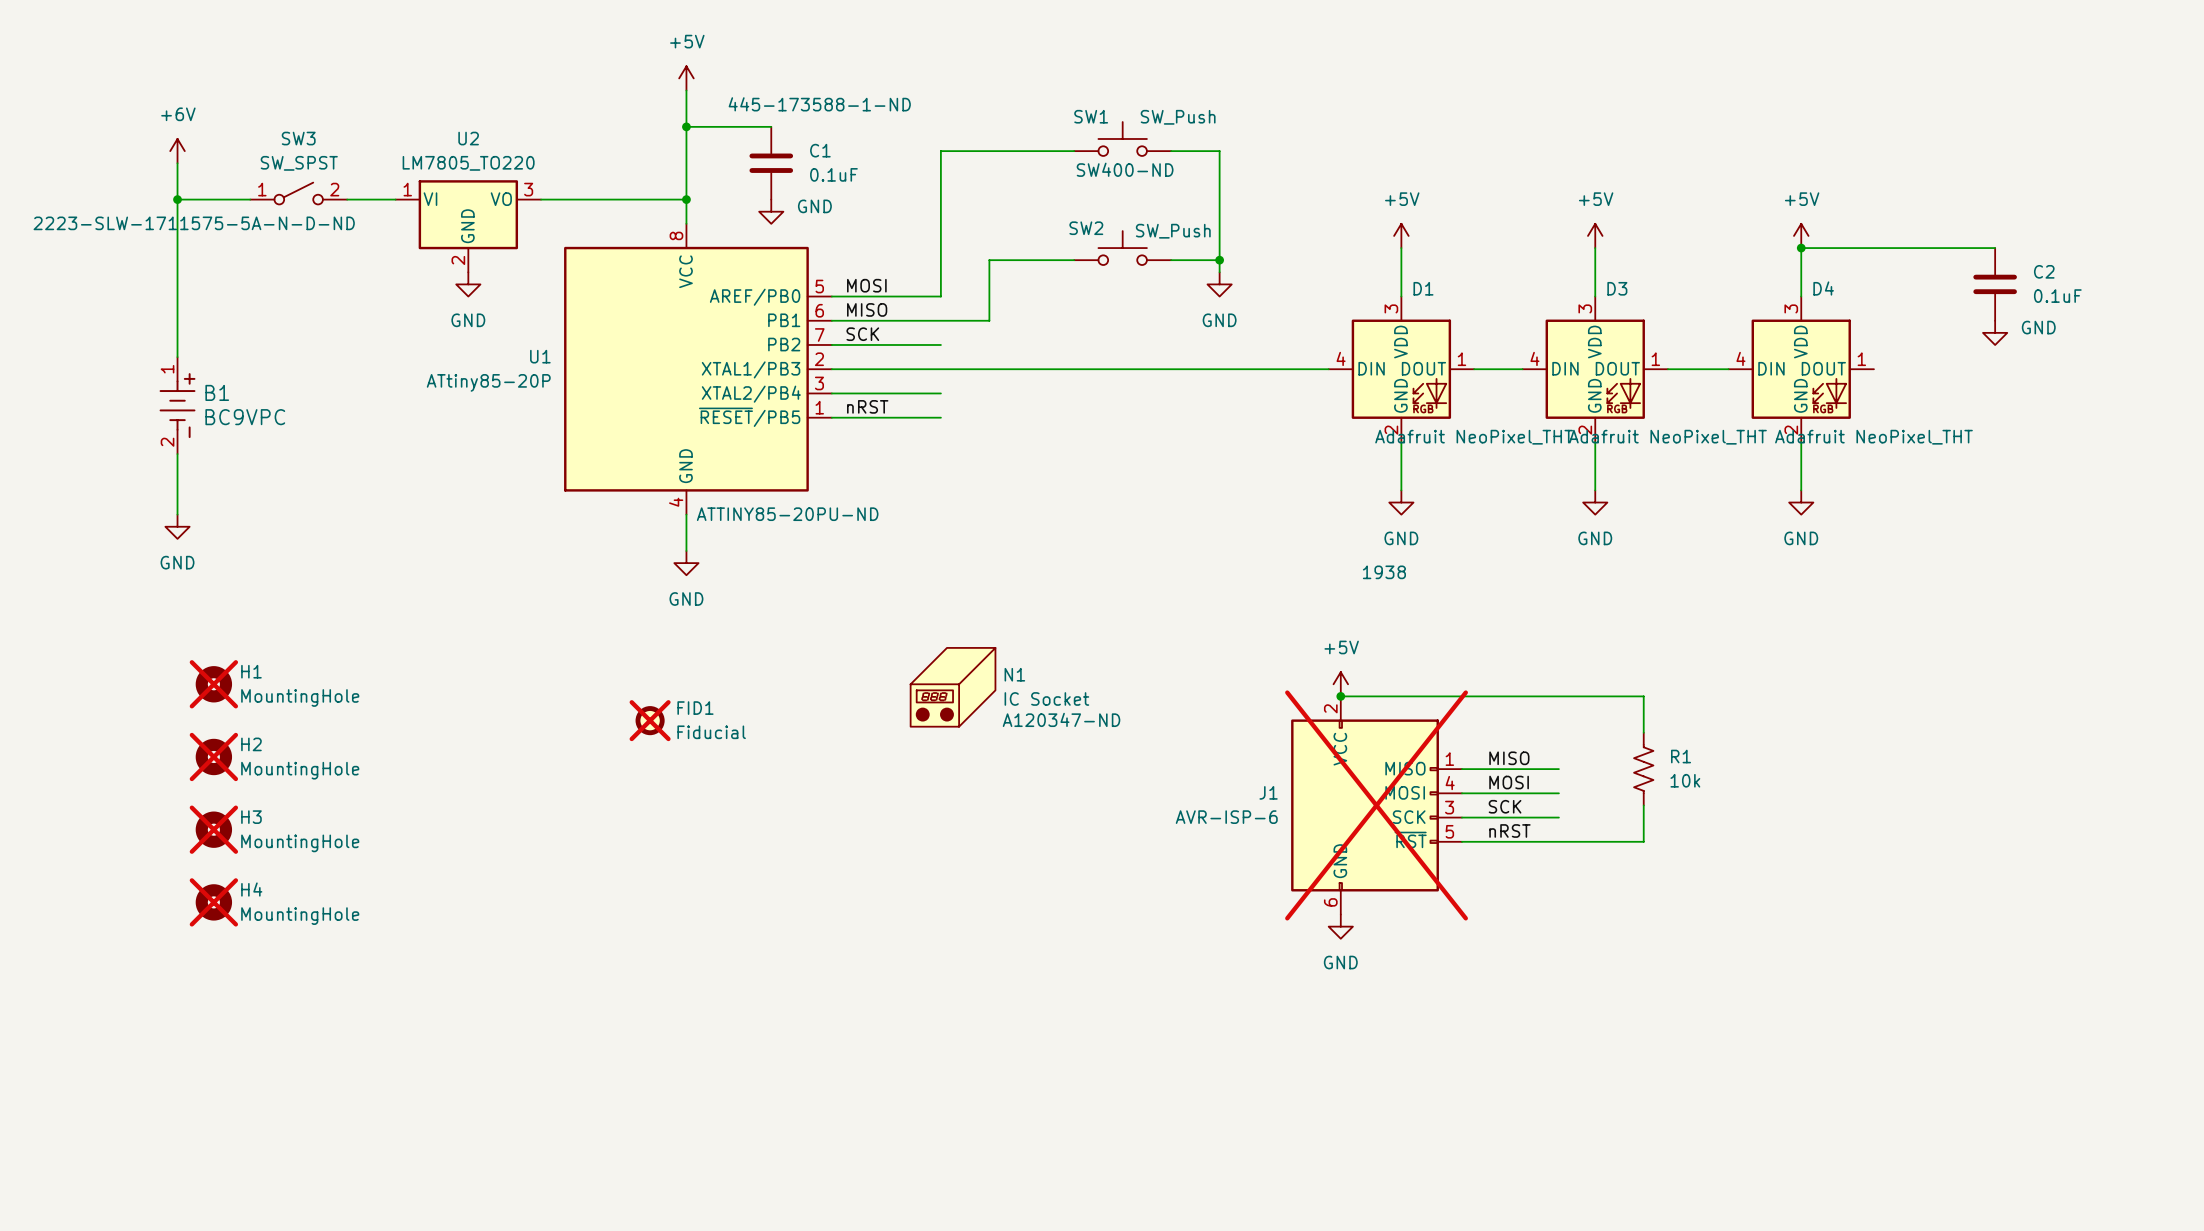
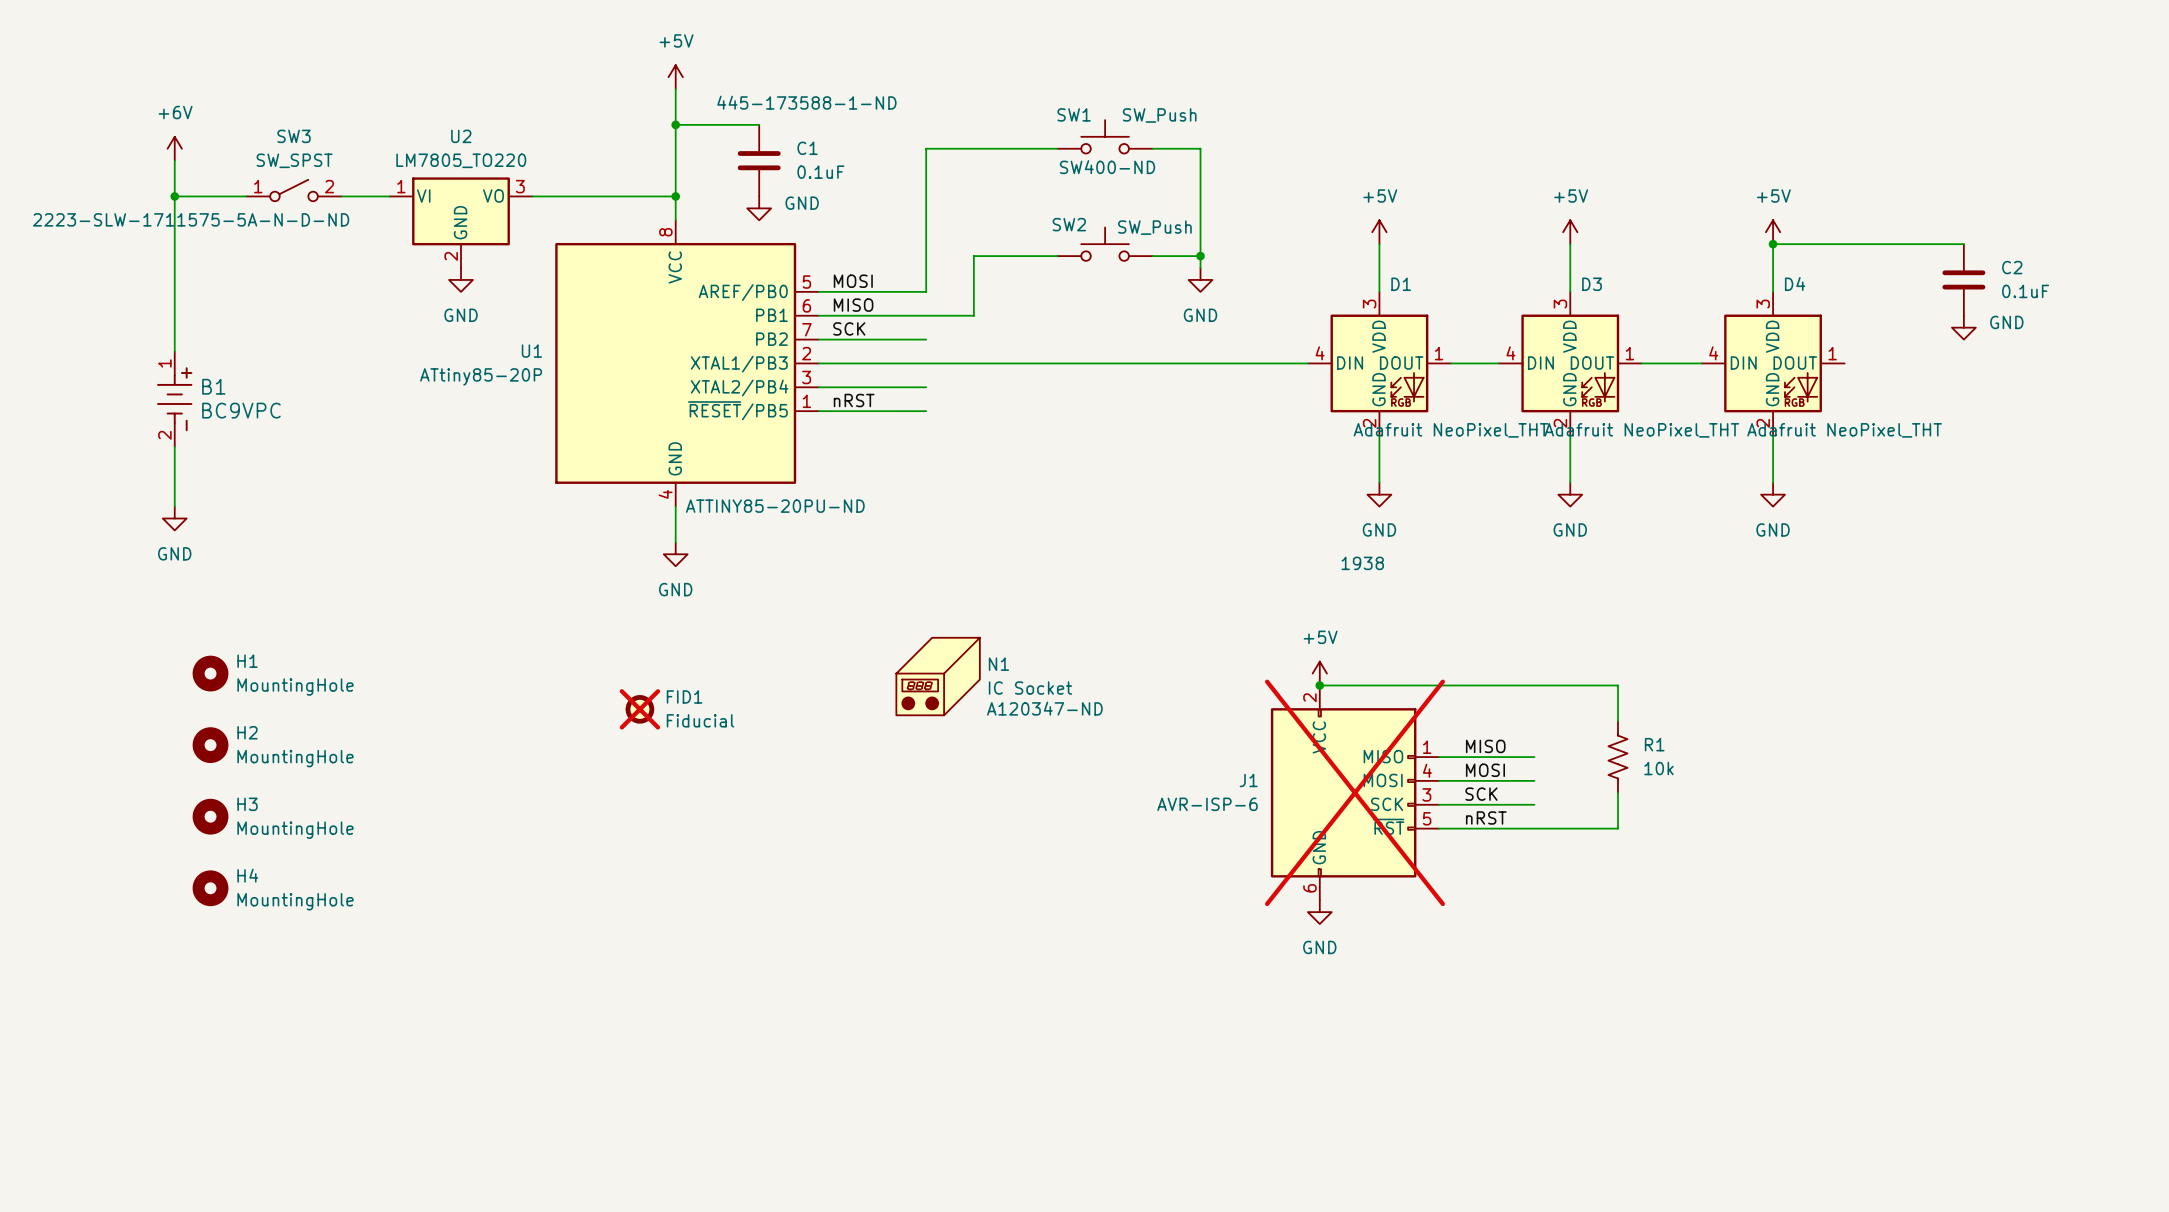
H1 do-not-place cross: (213, 684) -> none
H2 do-not-place cross: (213, 756) -> none
H3 do-not-place cross: (213, 829) -> none
H4 do-not-place cross: (213, 902) -> none

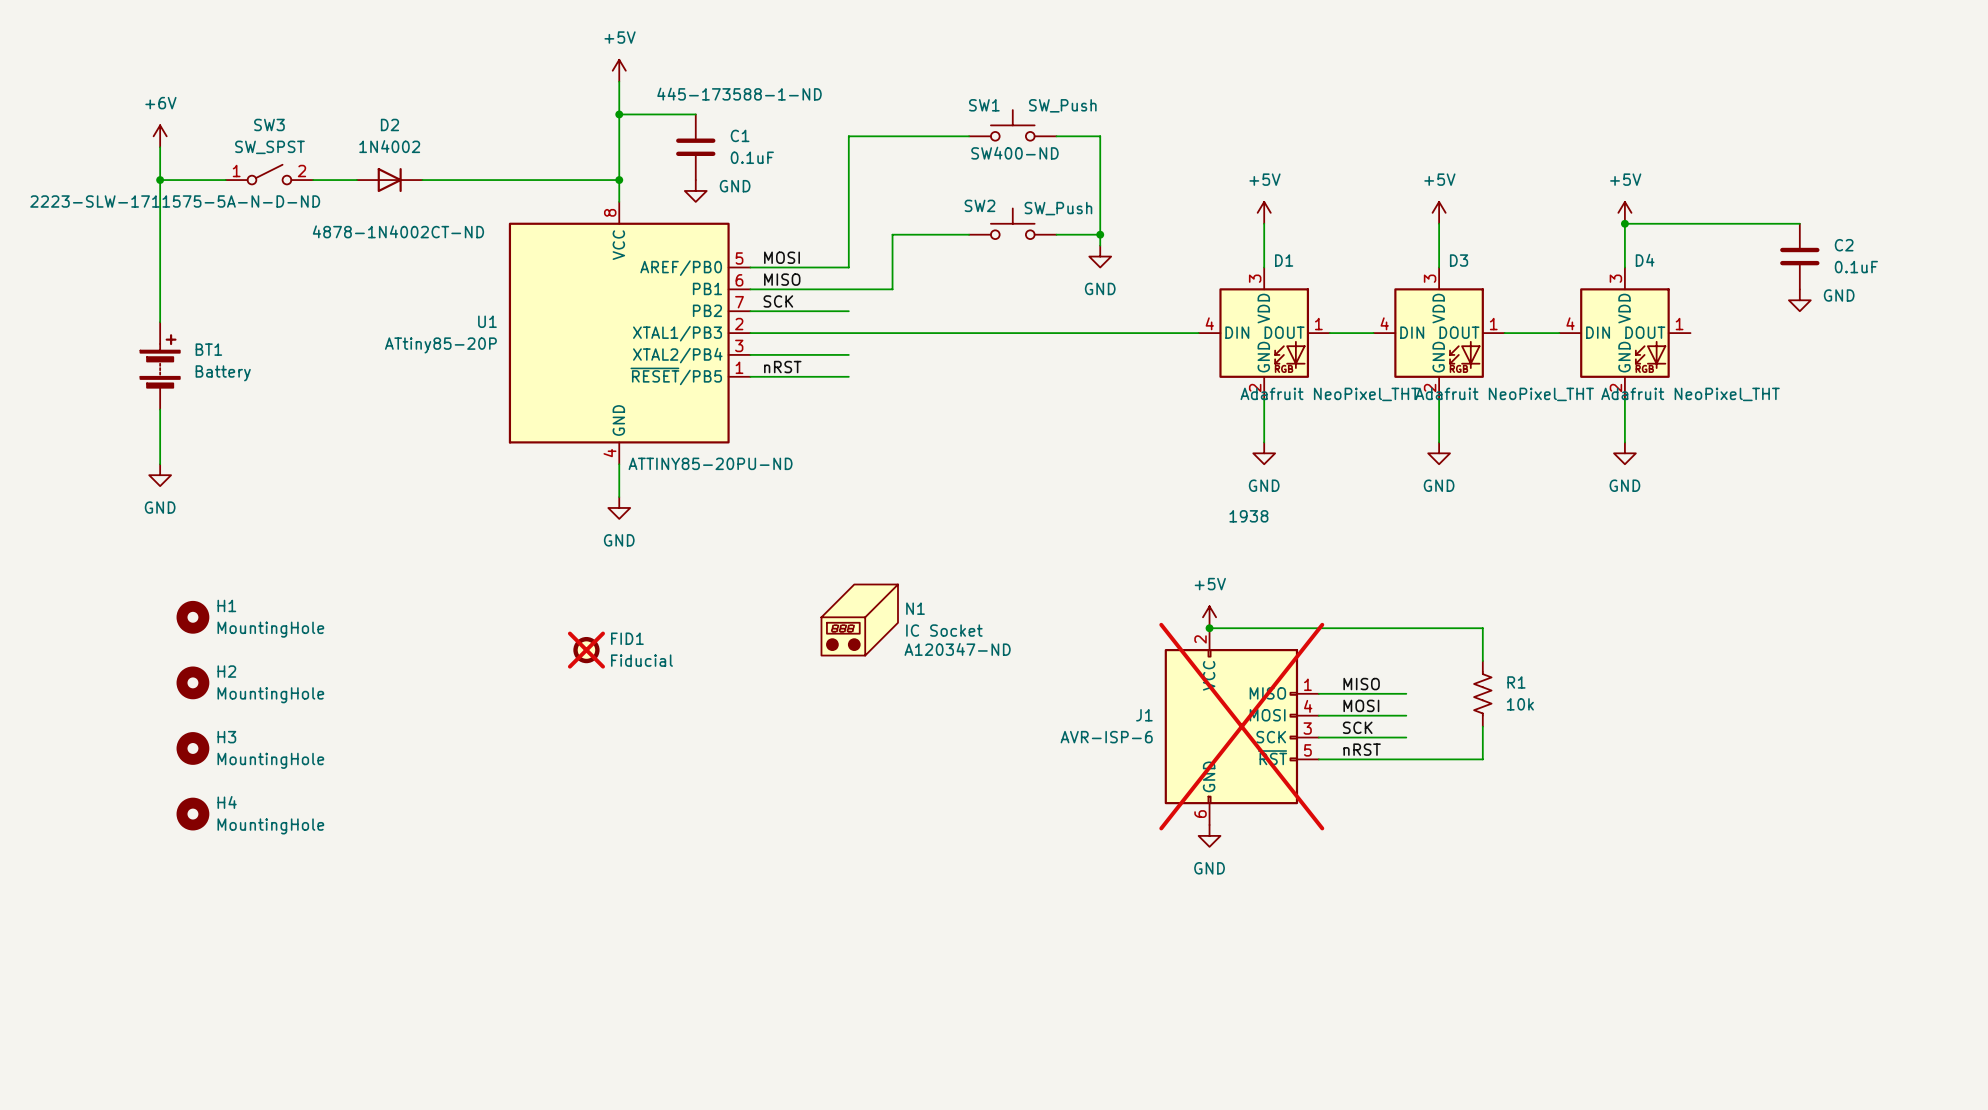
D2: none -> 1N4002 (389, 180)
U2: LM7805_TO220 (461, 222) -> none
power symbol: GND (461, 279) -> none
B1: BC9VPC (174, 399) -> none
BT1: none -> Battery (160, 365)

